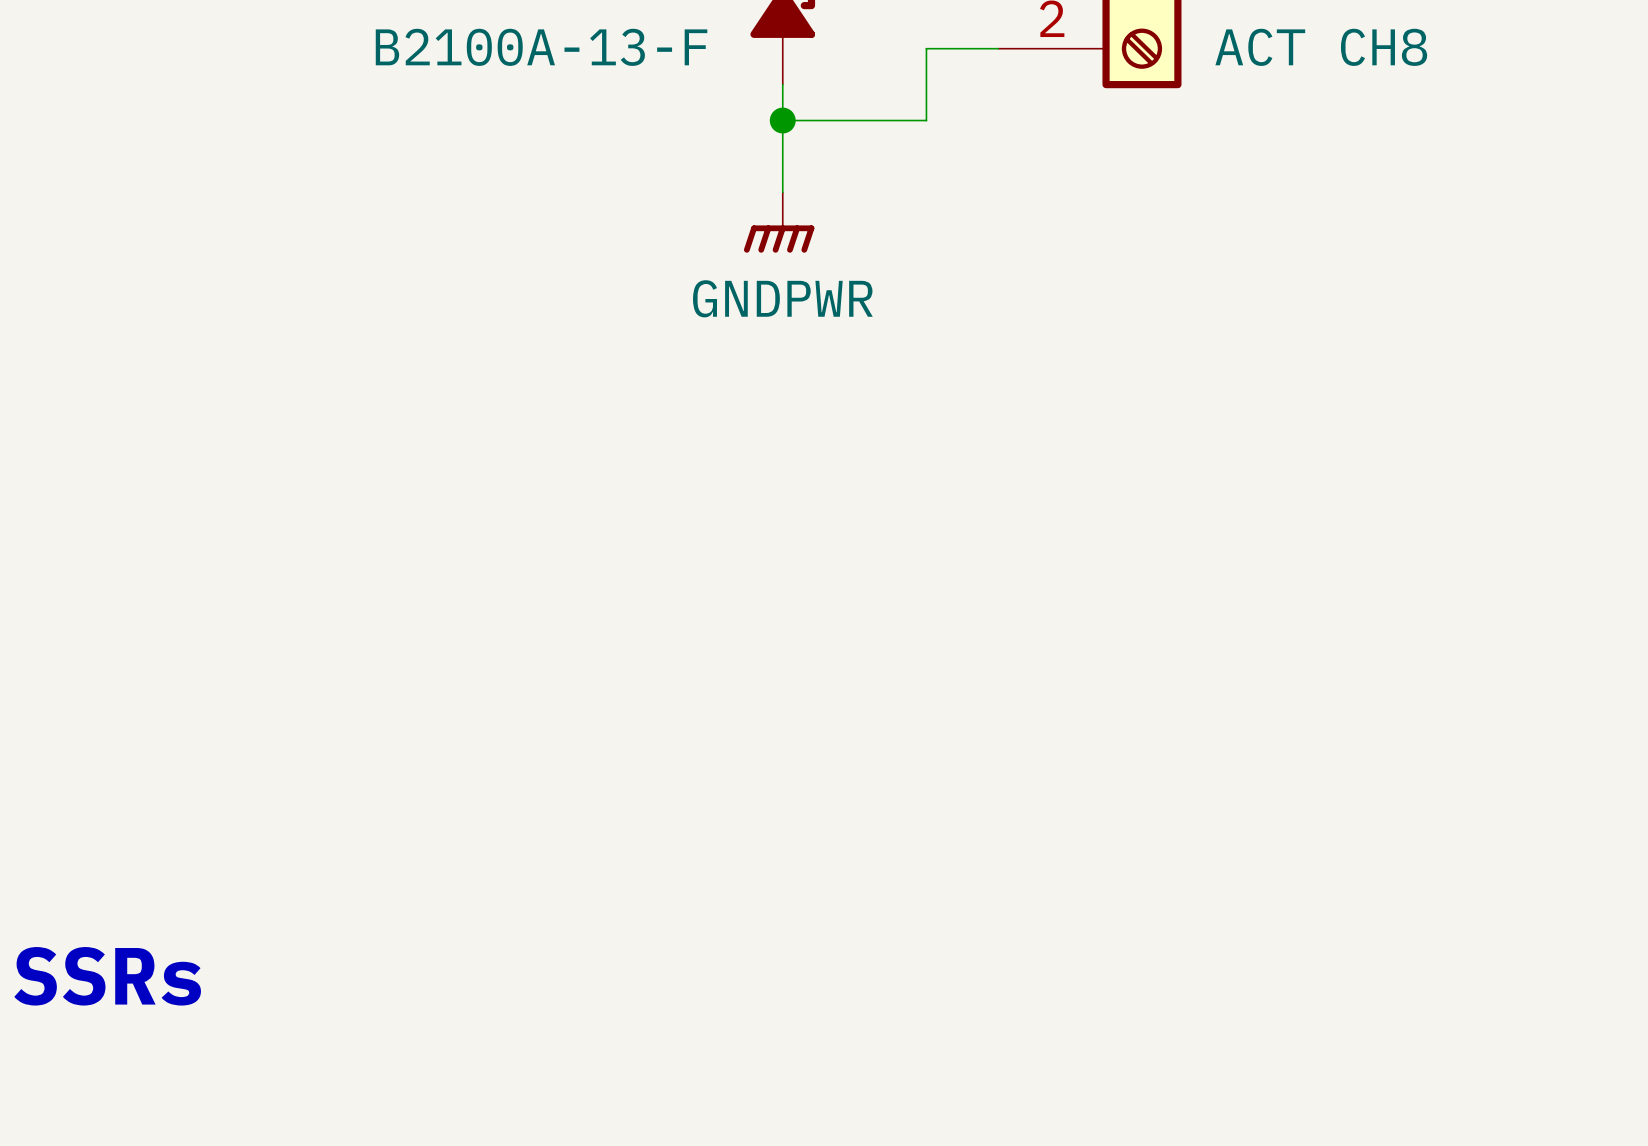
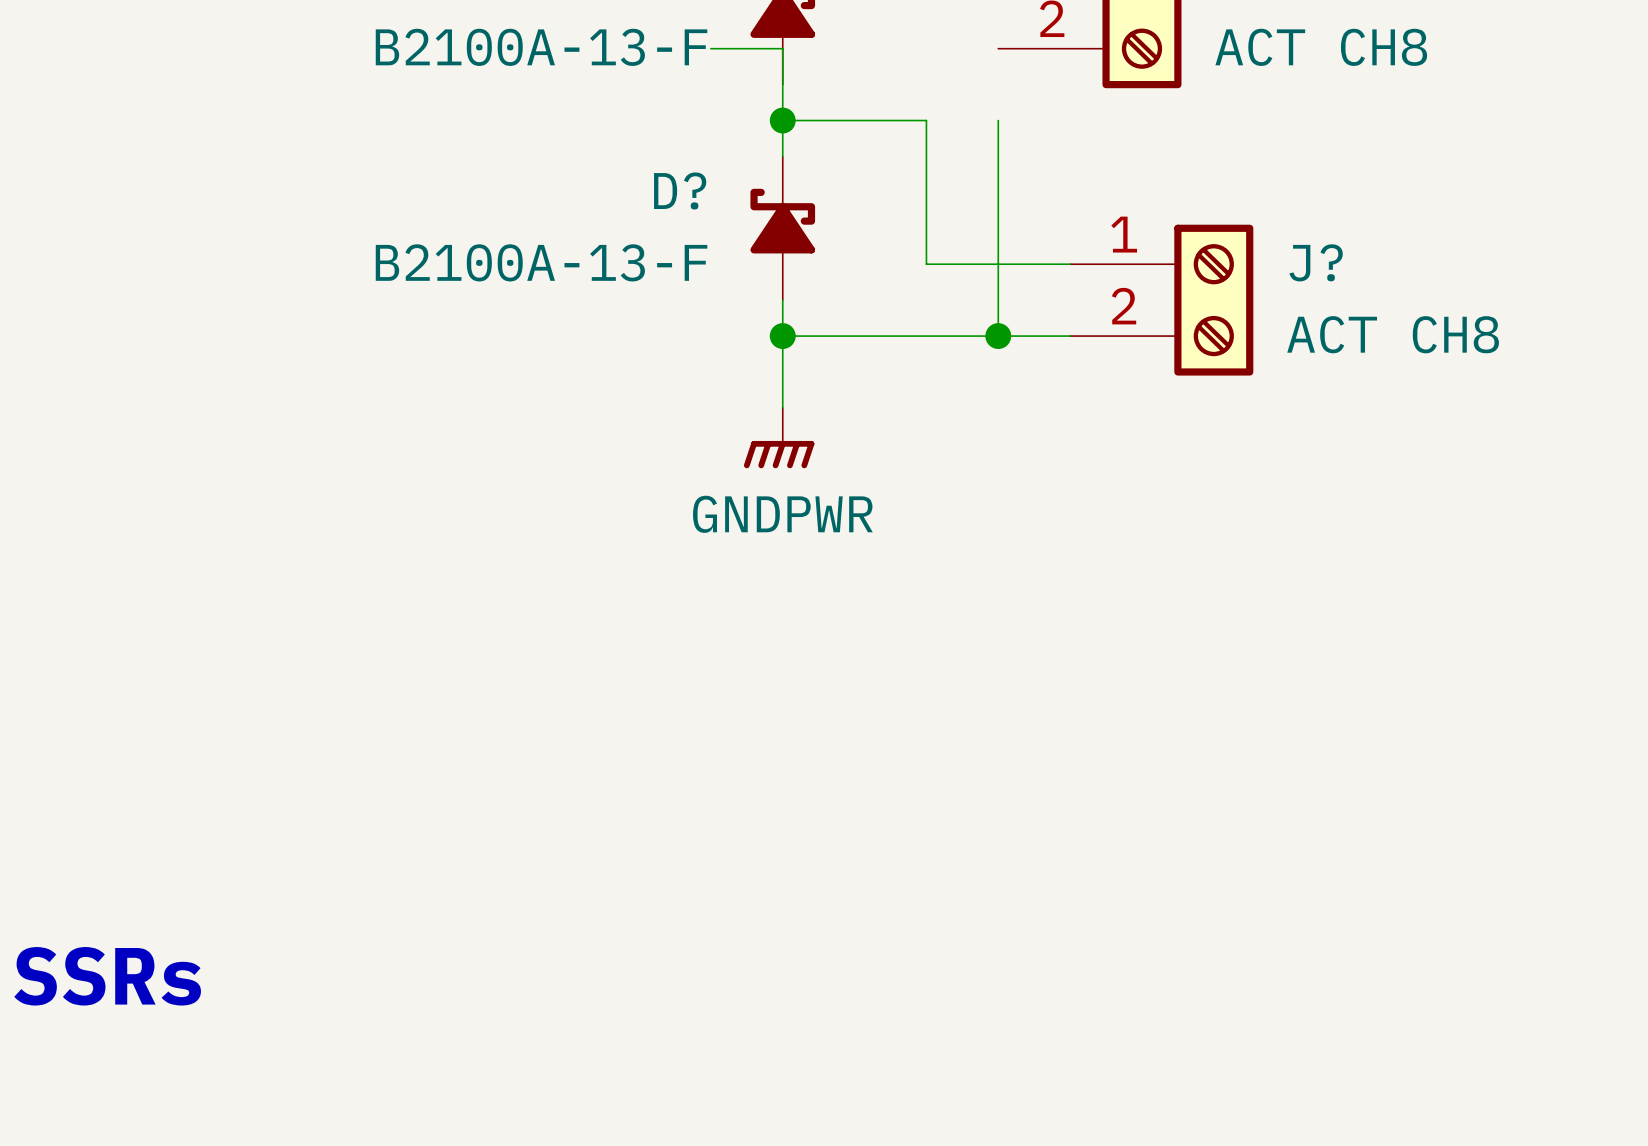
wire: none -> (710, 48) (782, 48) (782, 84)
wire: (998, 48) (926, 48) (926, 120) -> (1070, 264) (926, 264) (926, 120)
wire: none -> (998, 120) (998, 336)
power symbol position: GNDPWR (779, 222) -> GNDPWR (779, 438)
D?: none -> B2100A-13-F (782, 228)
wire: none -> (782, 300) (782, 407)
J?: none -> ACT CH8 (1161, 300)
wire: none -> (782, 336) (1070, 336)
junction: none -> (782, 336)
junction: none -> (998, 336)

